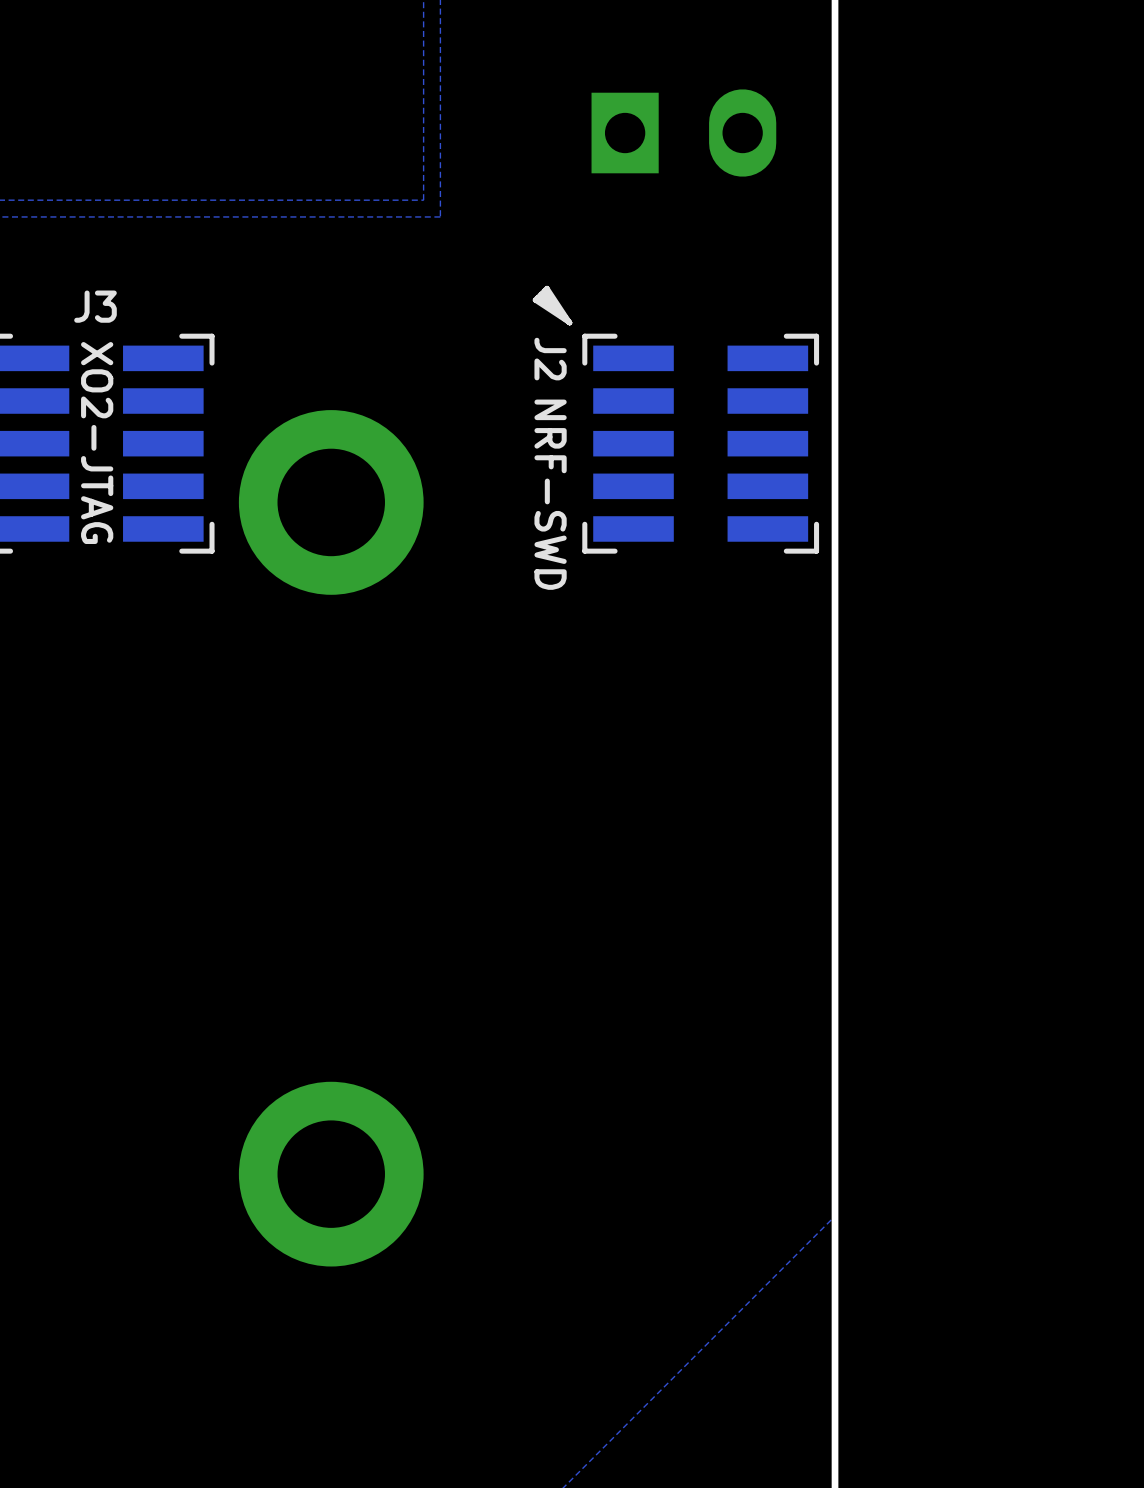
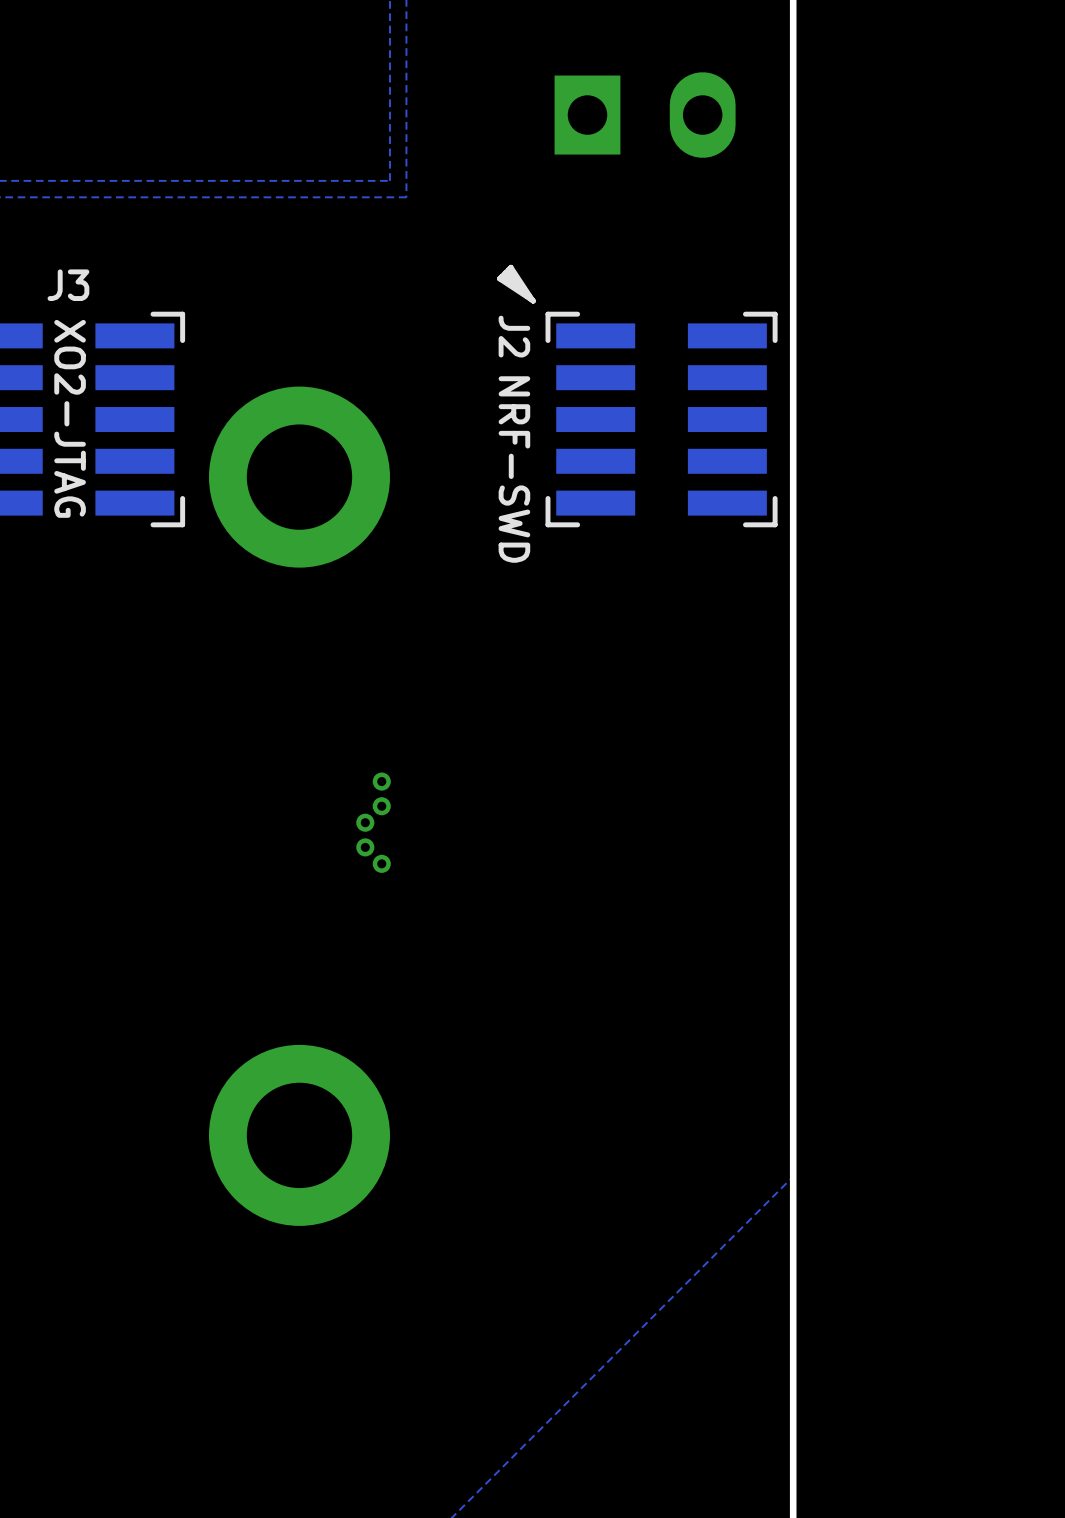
via: none -> (381, 781)
via: none -> (381, 806)
via: none -> (365, 822)
via: none -> (365, 847)
via: none -> (381, 863)

